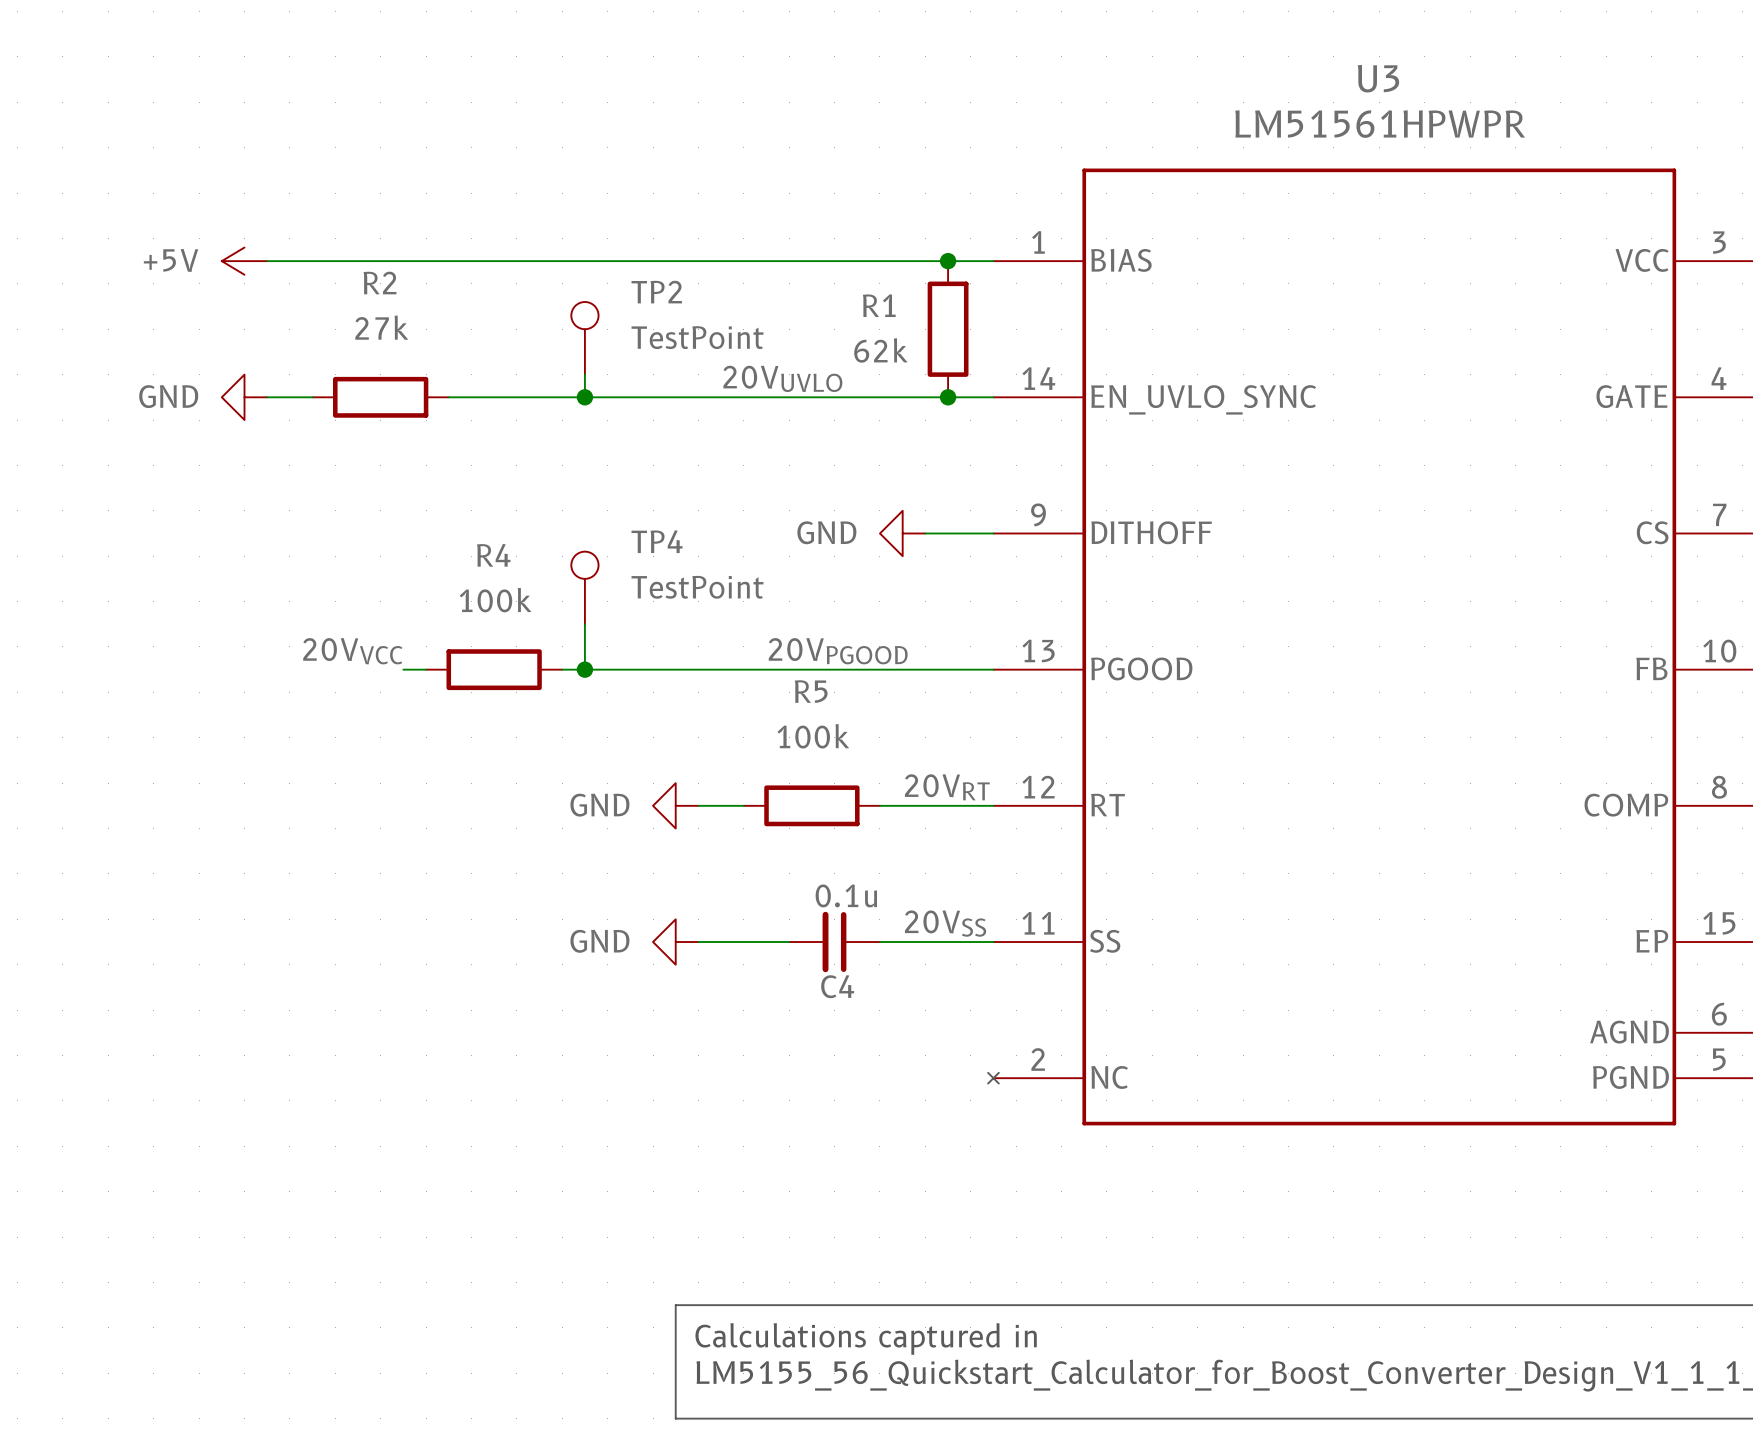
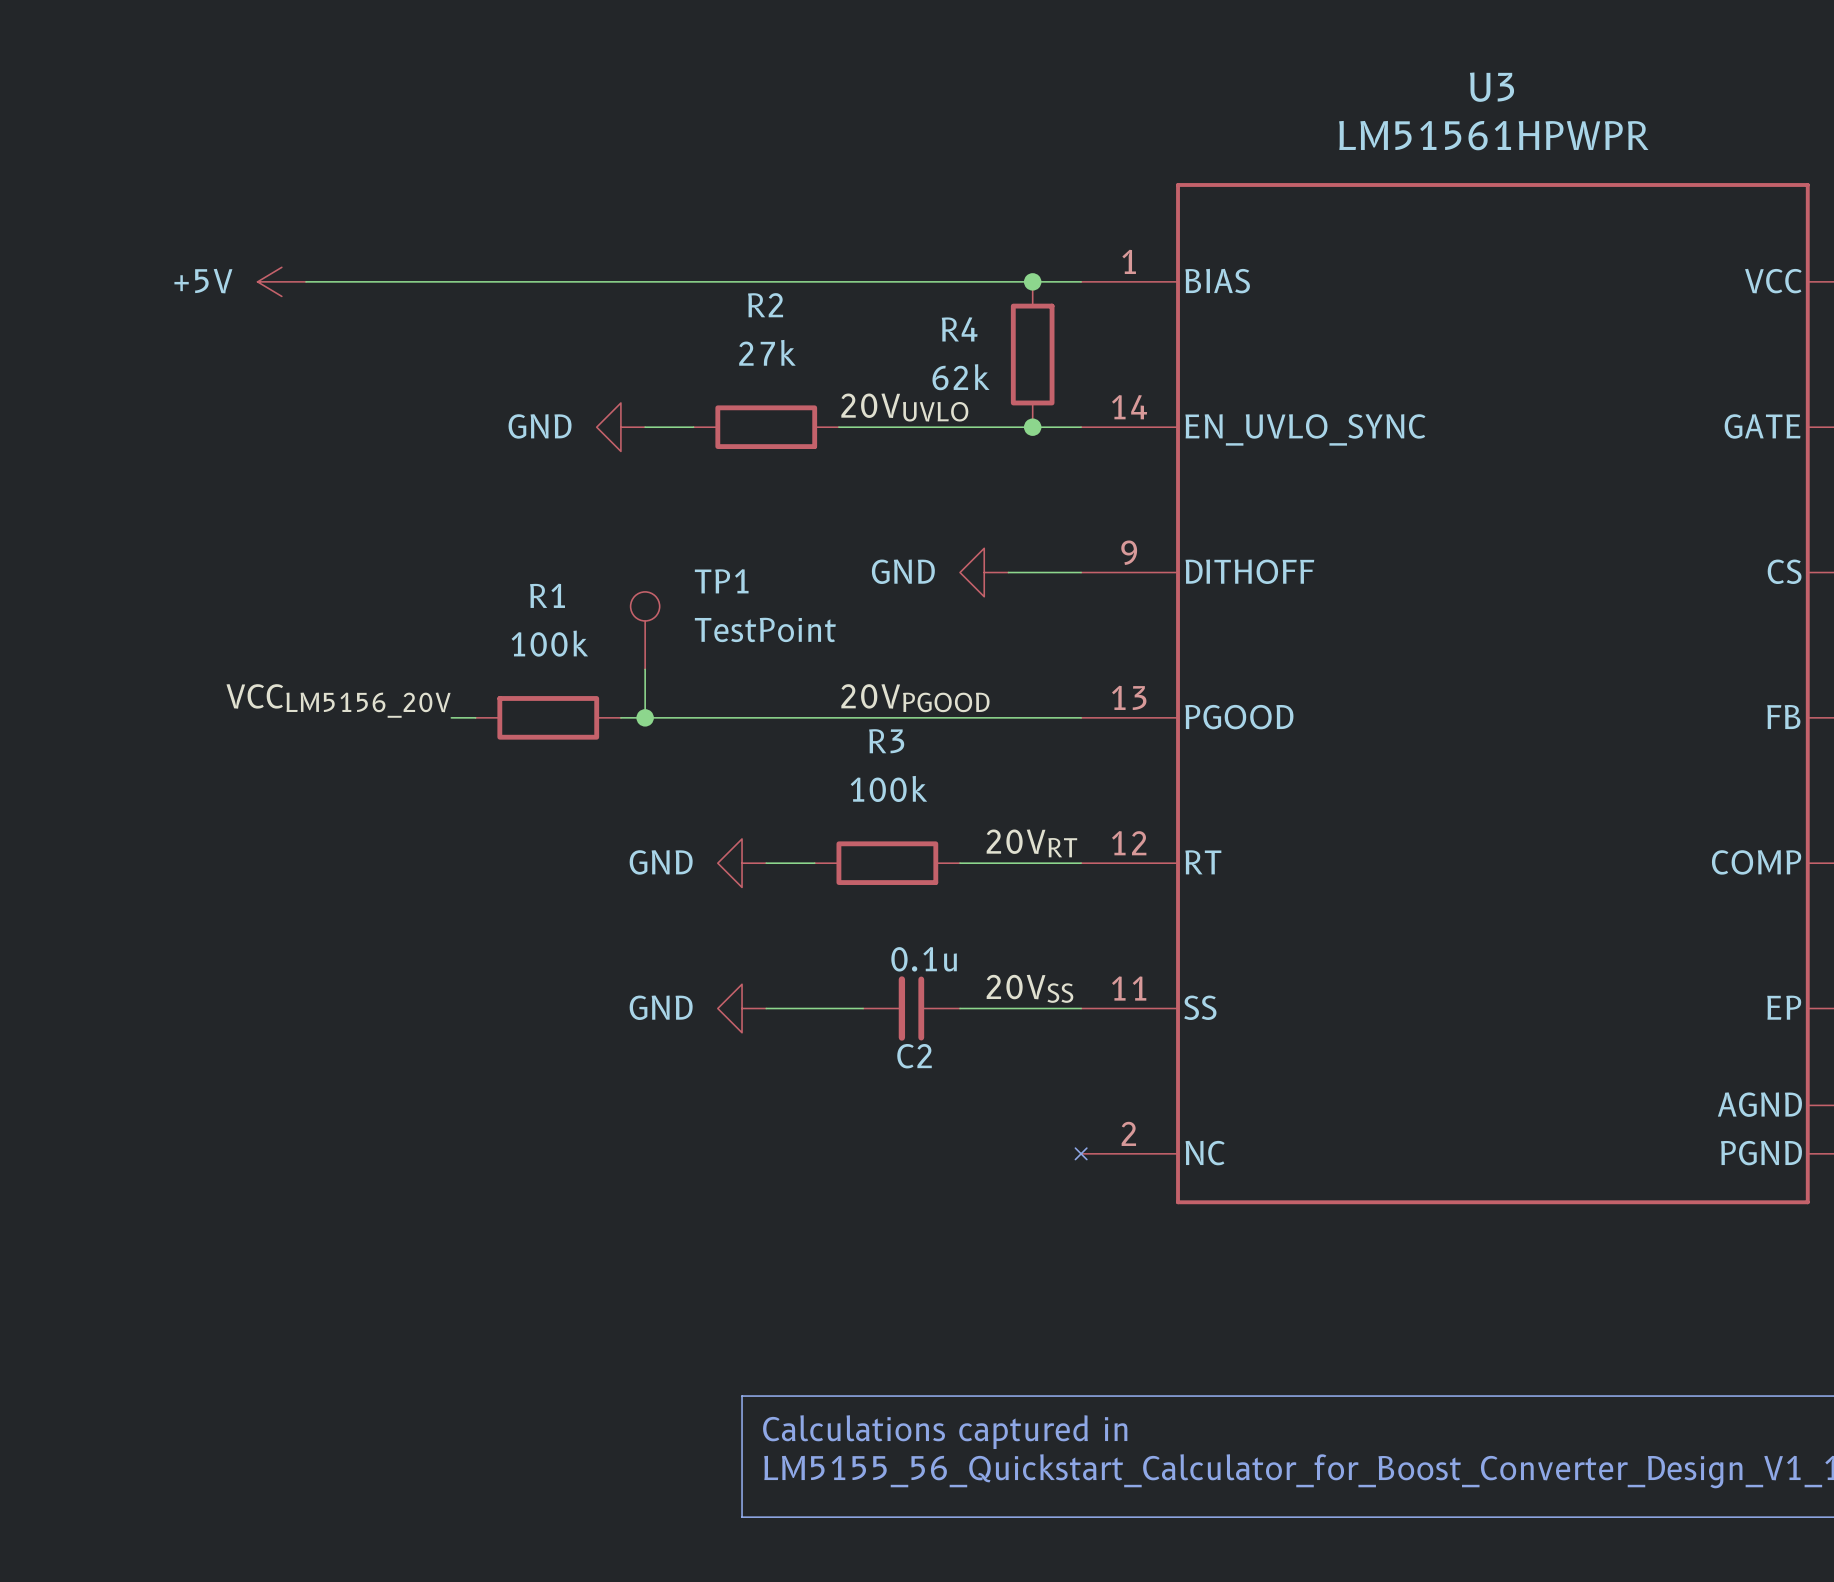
R1 name: R1 (879, 305) -> R4 (959, 329)
TP2: TestPoint (584, 338) -> none
wire: (584, 374) (584, 397) (448, 397) -> none
label position: 20VUVLO (782, 378) -> 20VUVLO (904, 407)
power symbol position: GND (244, 397) -> GND (620, 427)
wire: (267, 397) (312, 397) -> none
R2 position: (380, 397) -> (766, 427)
junction: (584, 397) -> none
wire: (630, 397) (766, 397) -> none
TP4 name: TP4 (657, 541) -> TP1 (721, 581)
R4 name: R4 (493, 555) -> R1 (547, 595)
label: 20VVCC (352, 651) -> VCCLM5156_20V (338, 700)
R5 name: R5 (811, 691) -> R3 (886, 741)
C4 name: C4 (837, 986) -> C2 (914, 1056)

